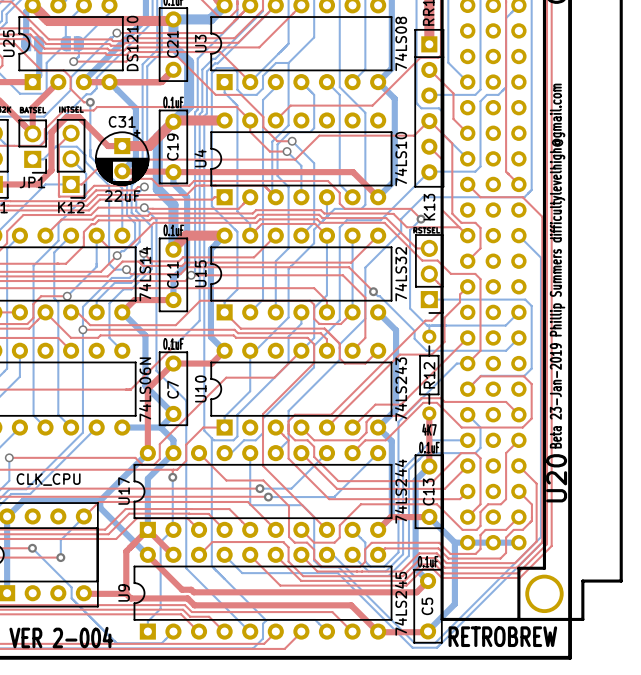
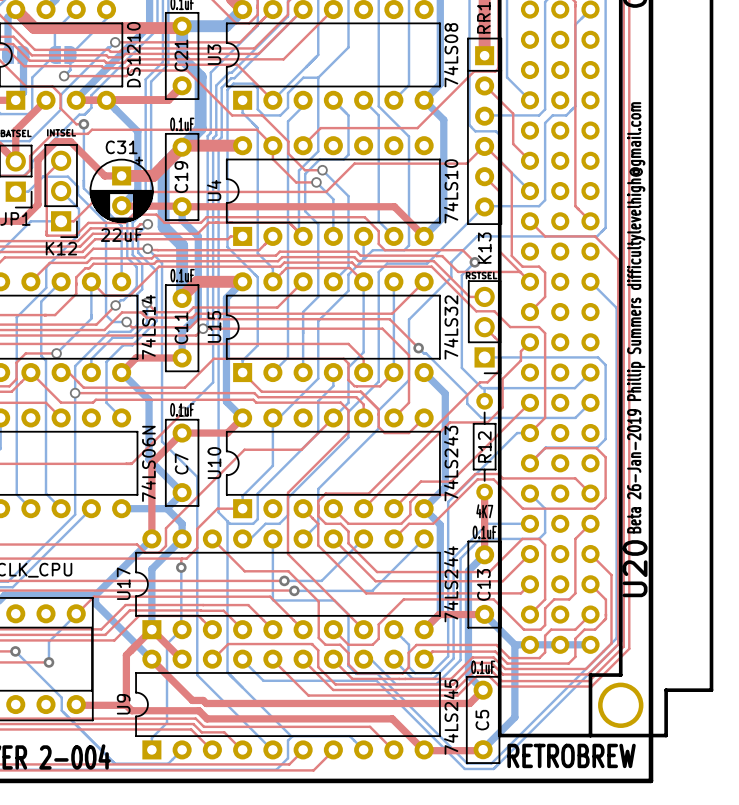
text: Beta 23-Jan-2019 Phillip Summers difficultylevelhigh@gmail.com (557, 266) -> Beta 26-Jan-2019 Phillip Summers difficultylevelhigh@gmail.com (636, 317)

